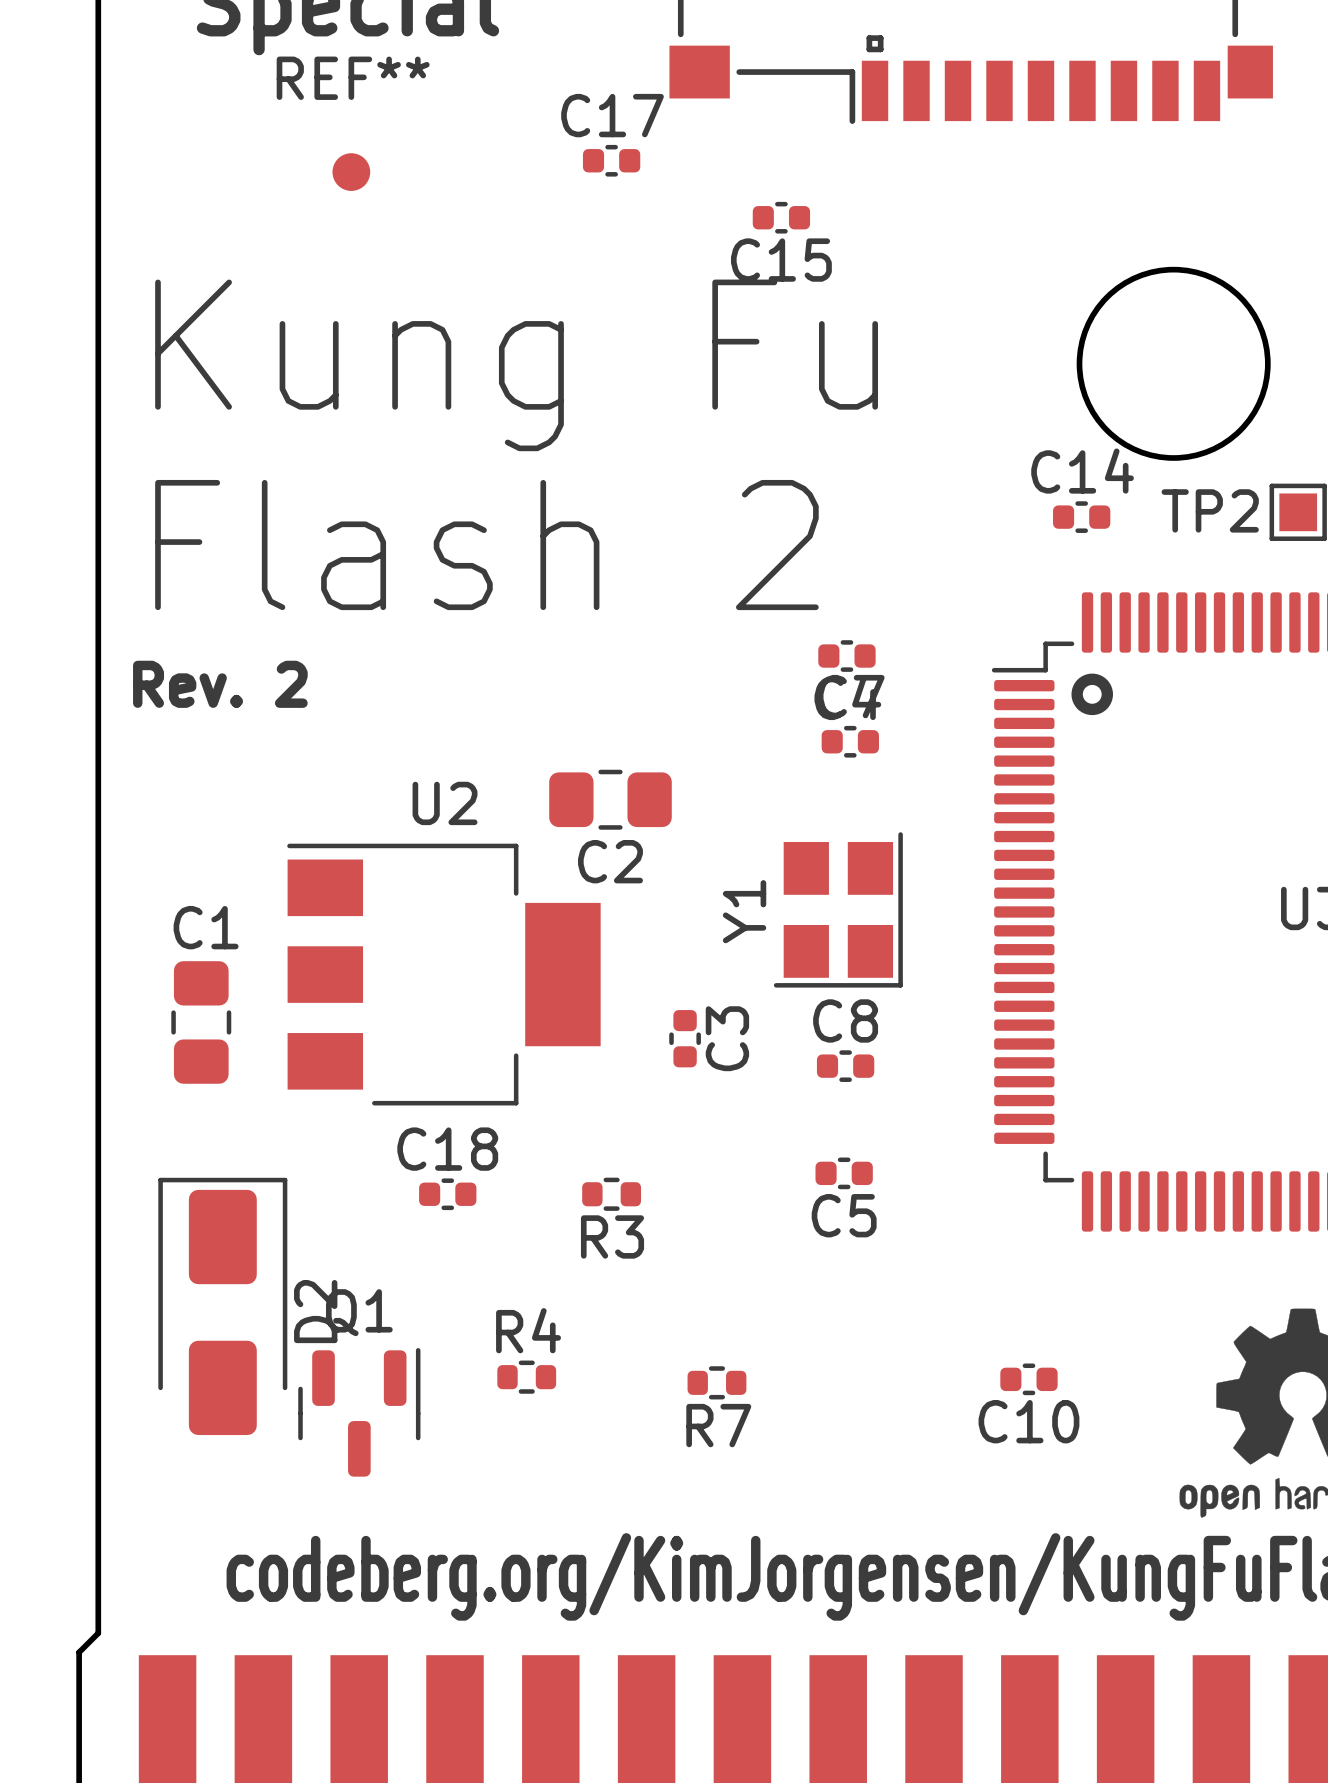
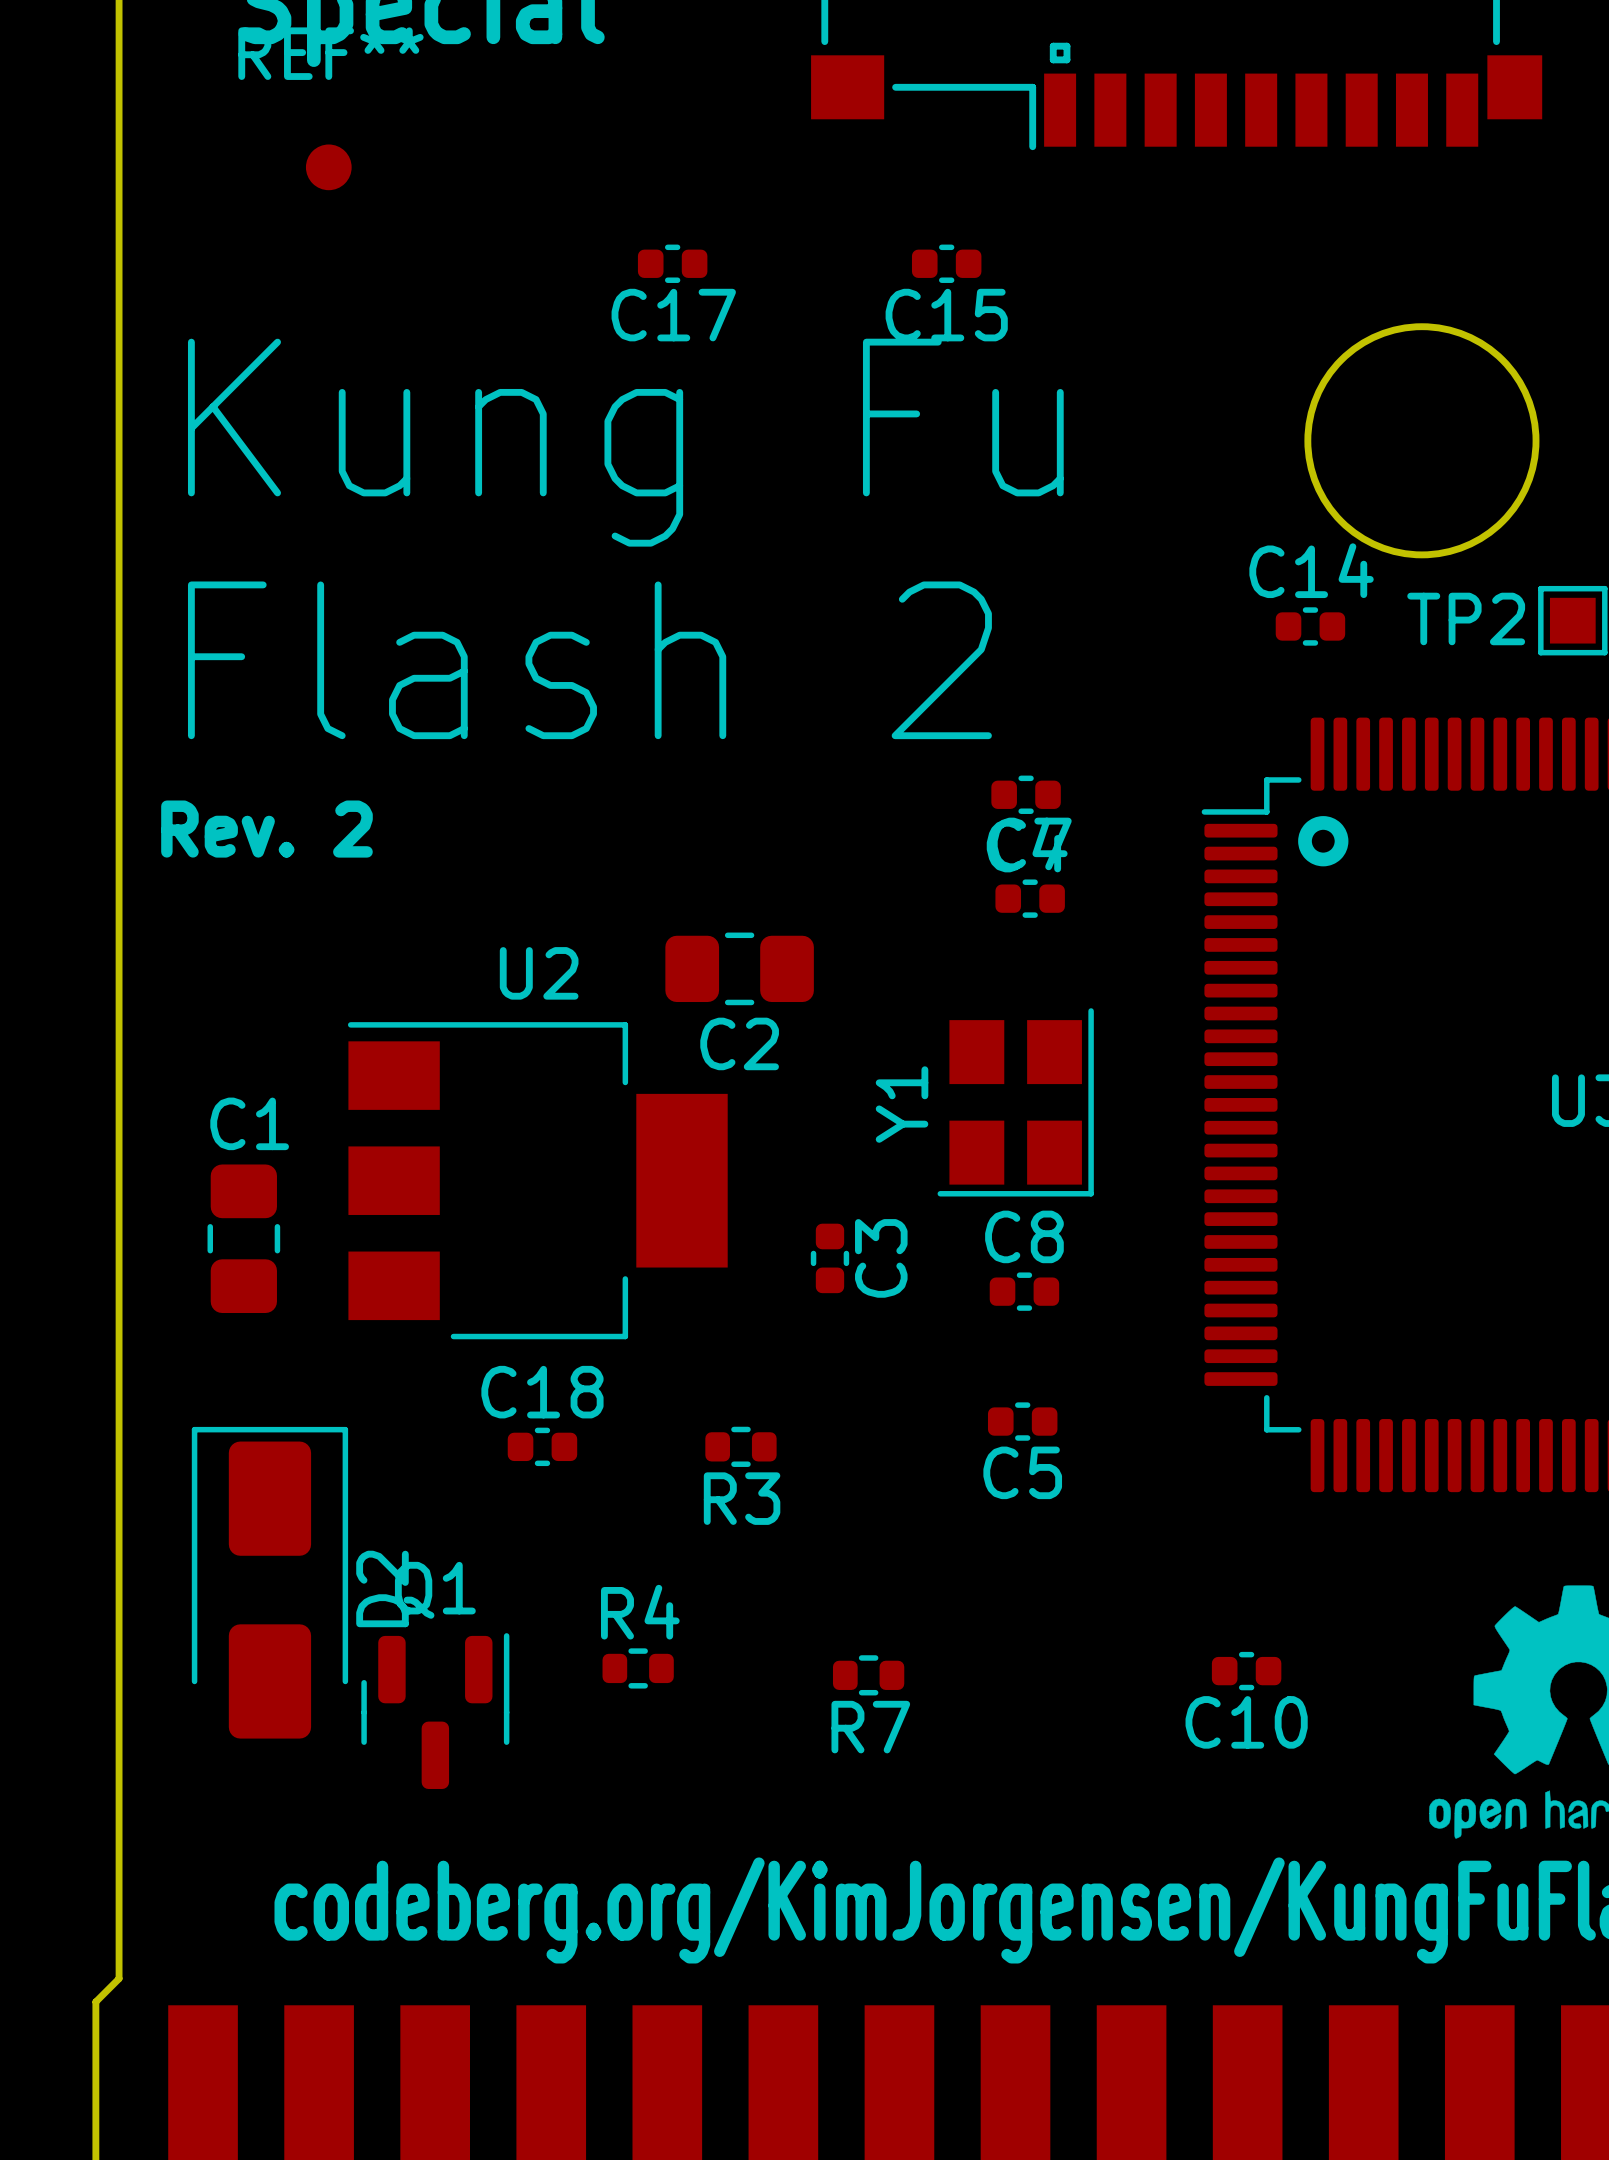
C17 name position: C17 (612, 115) -> C17 (673, 315)
C17 position: (611, 160) -> (672, 263)
REF** position: (351, 172) -> (328, 167)

